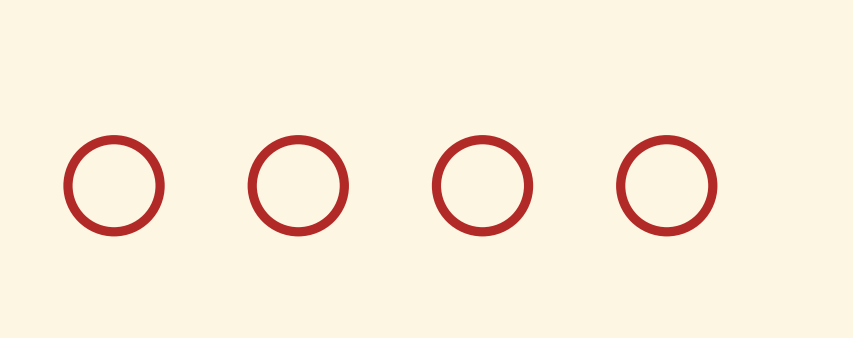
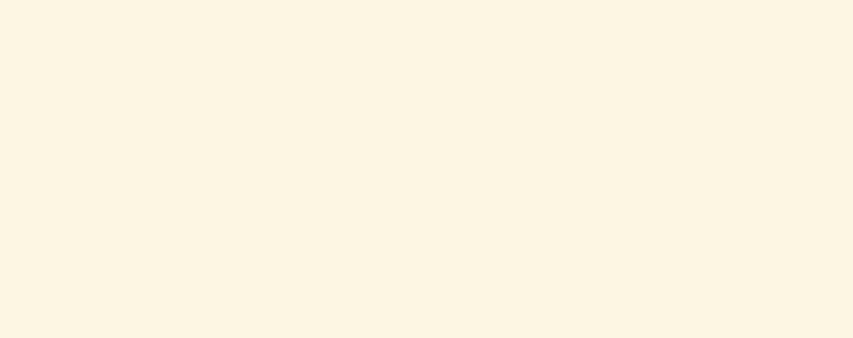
part: (114, 185) -> none
part: (298, 185) -> none
part: (482, 185) -> none
part: (666, 185) -> none

